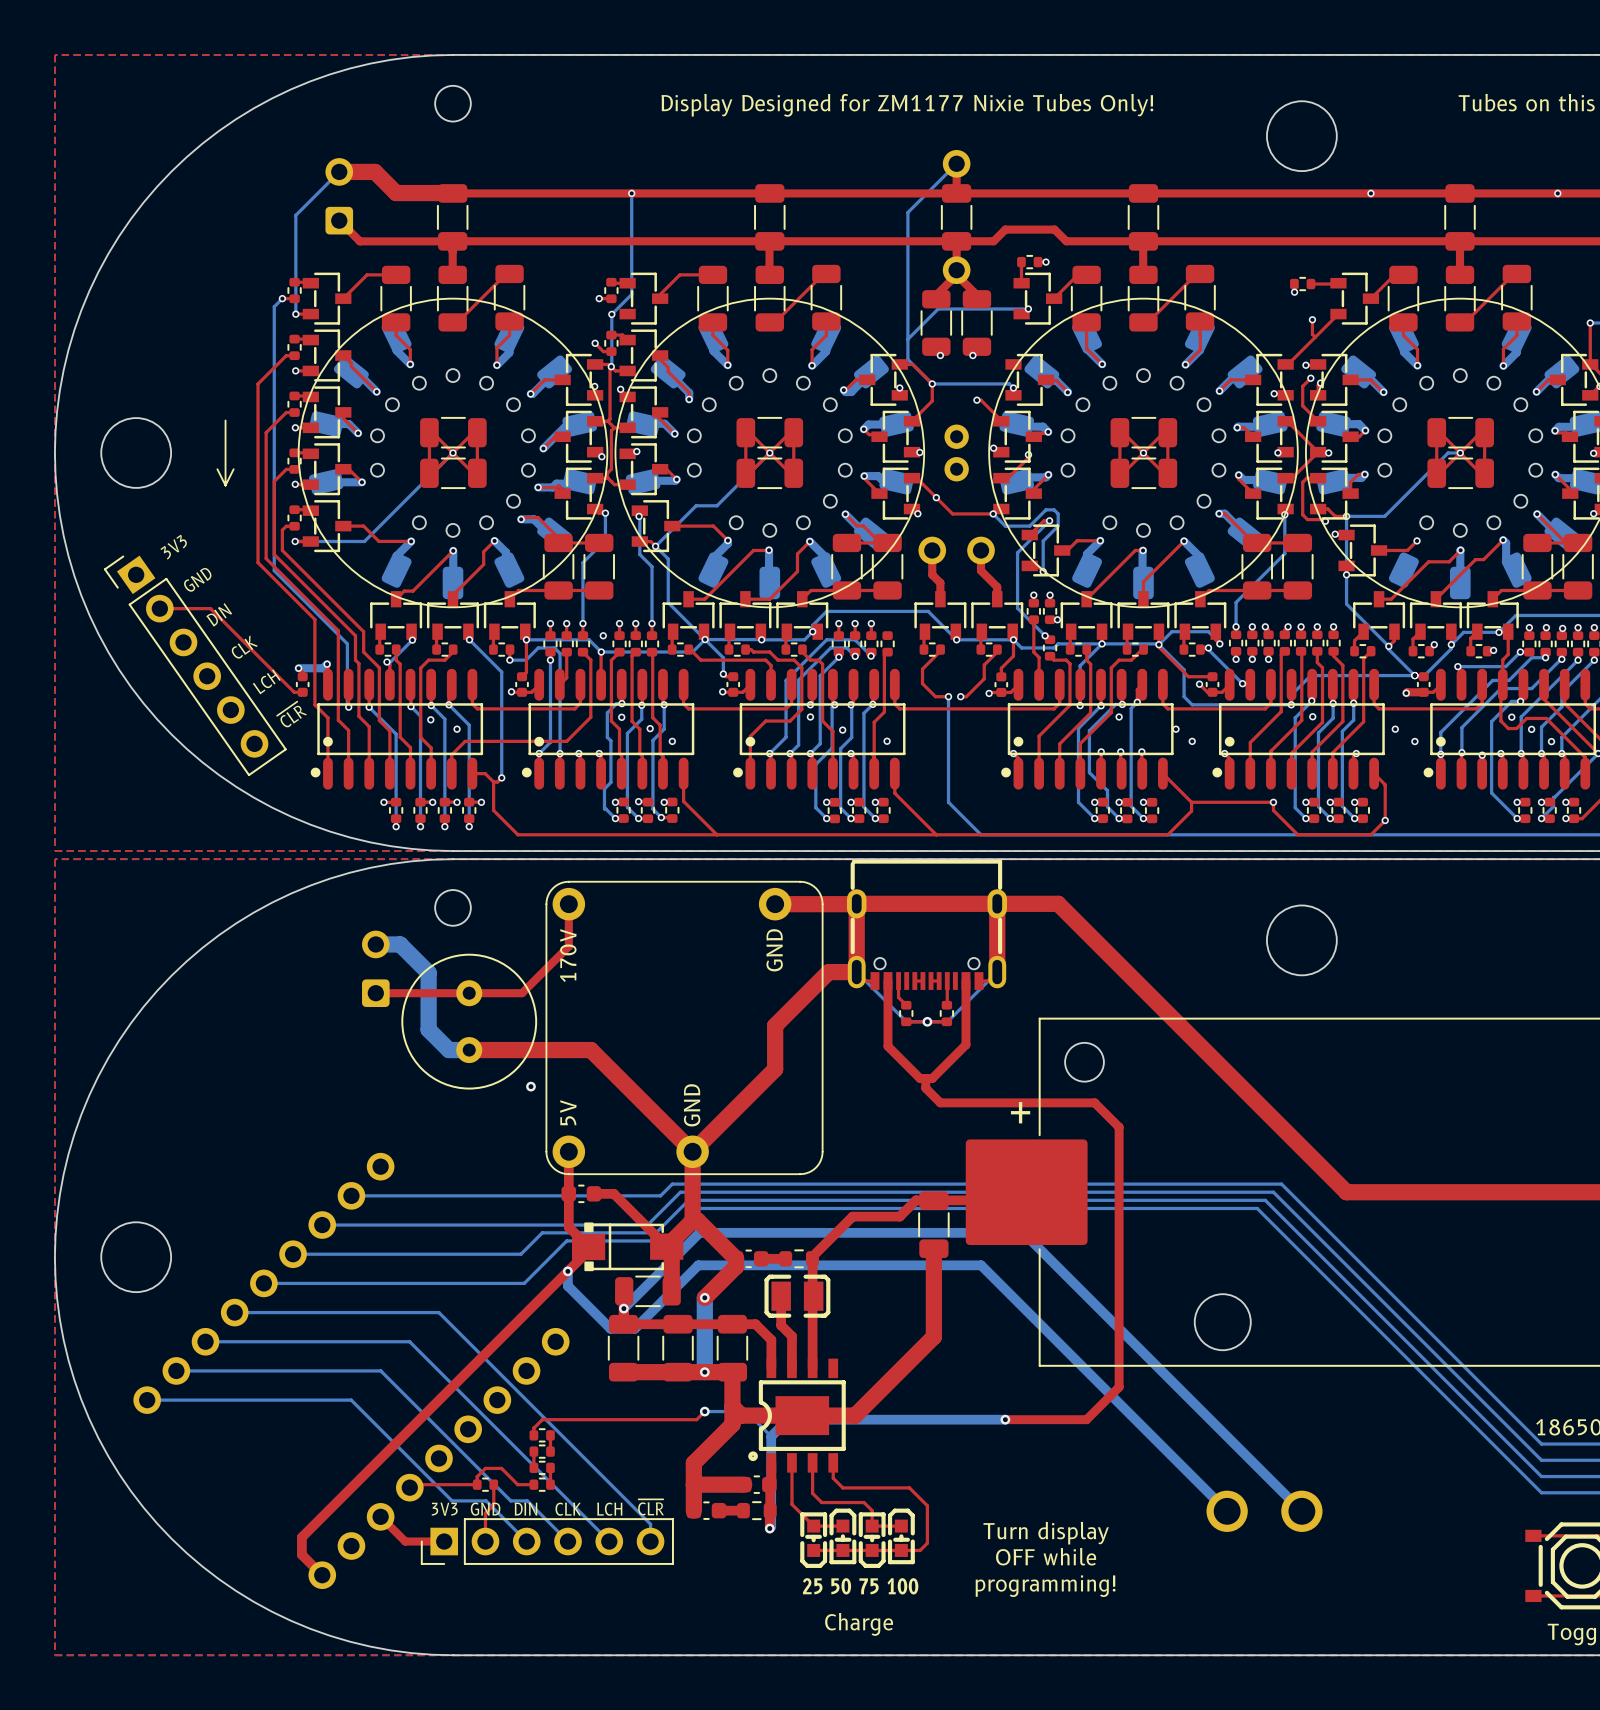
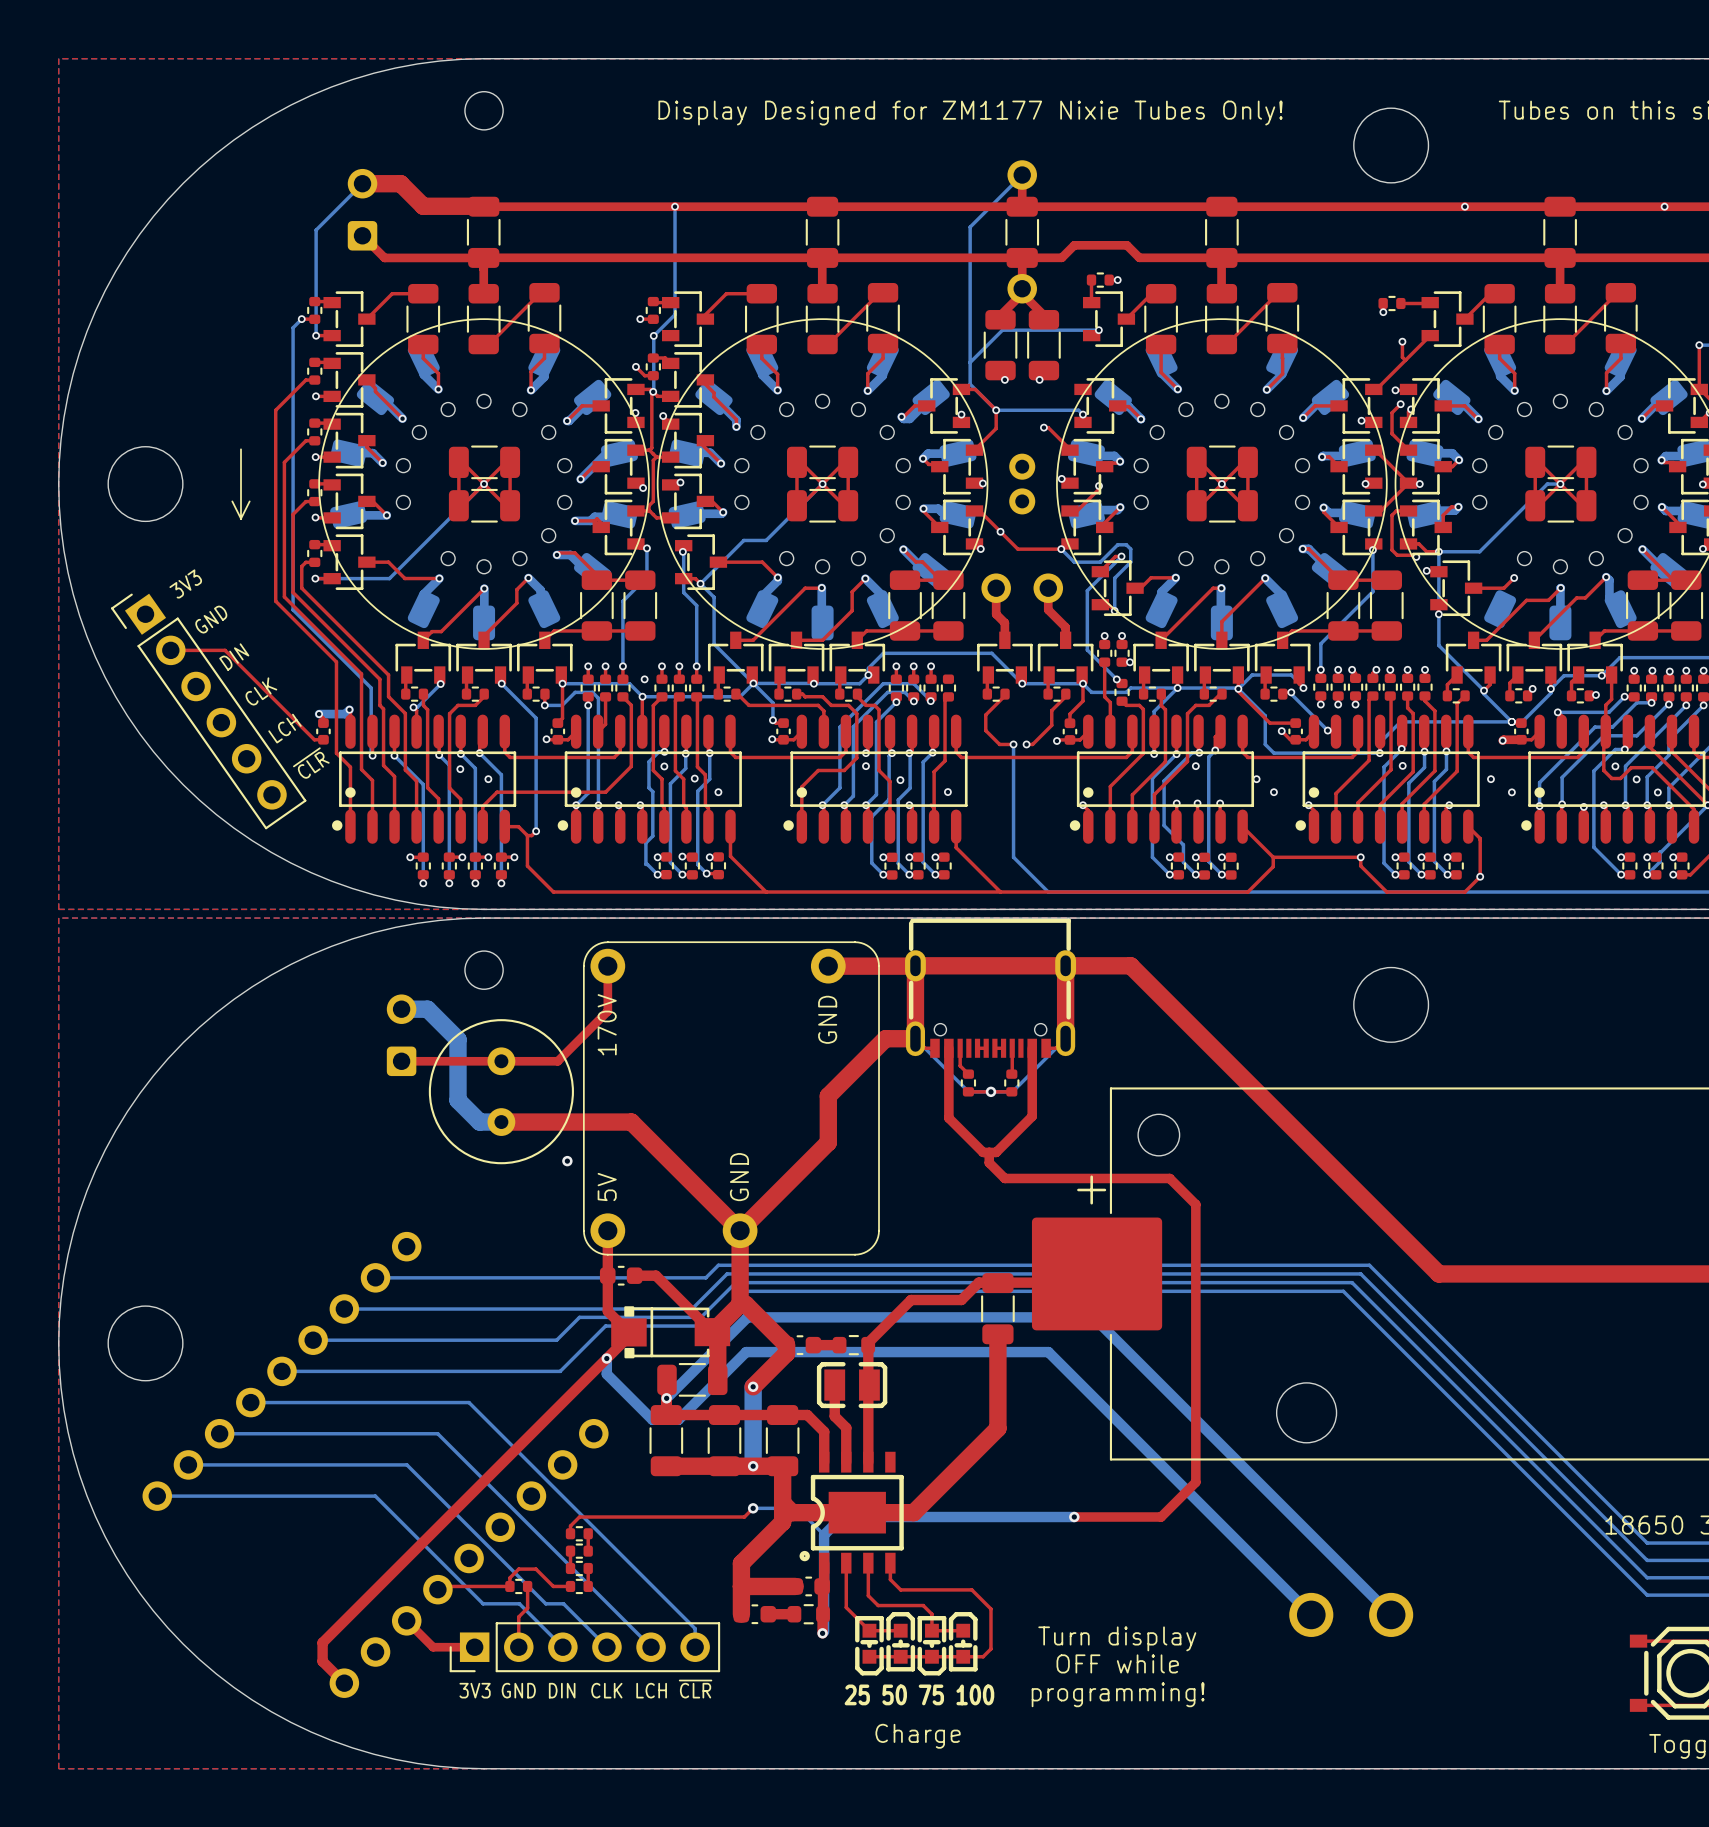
text position: ~{CLR} (651, 1507) -> ~{CLR} (695, 1689)
text position: 3V3 (444, 1509) -> 3V3 (475, 1690)
text position: GND (485, 1509) -> GND (518, 1690)
text position: DIN (525, 1509) -> DIN (562, 1690)
text position: CLK (568, 1509) -> CLK (606, 1690)
text position: LCH (609, 1509) -> LCH (651, 1690)

